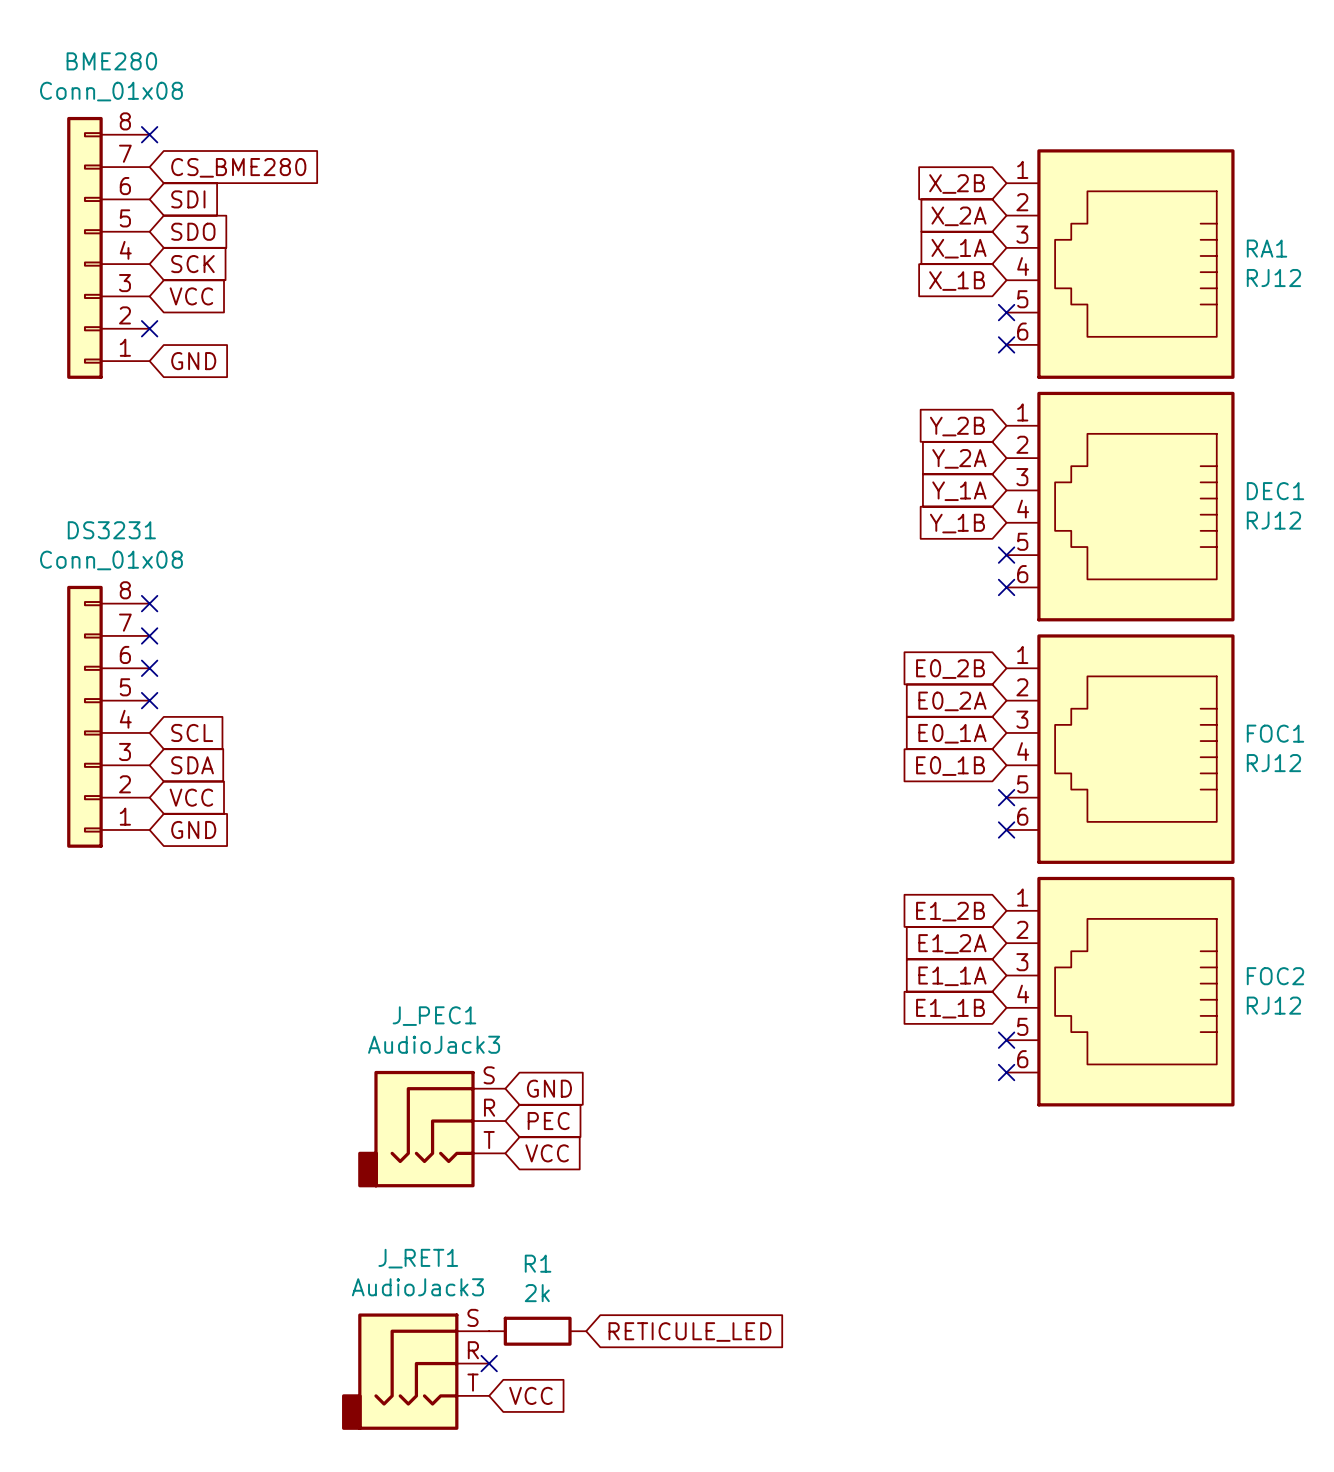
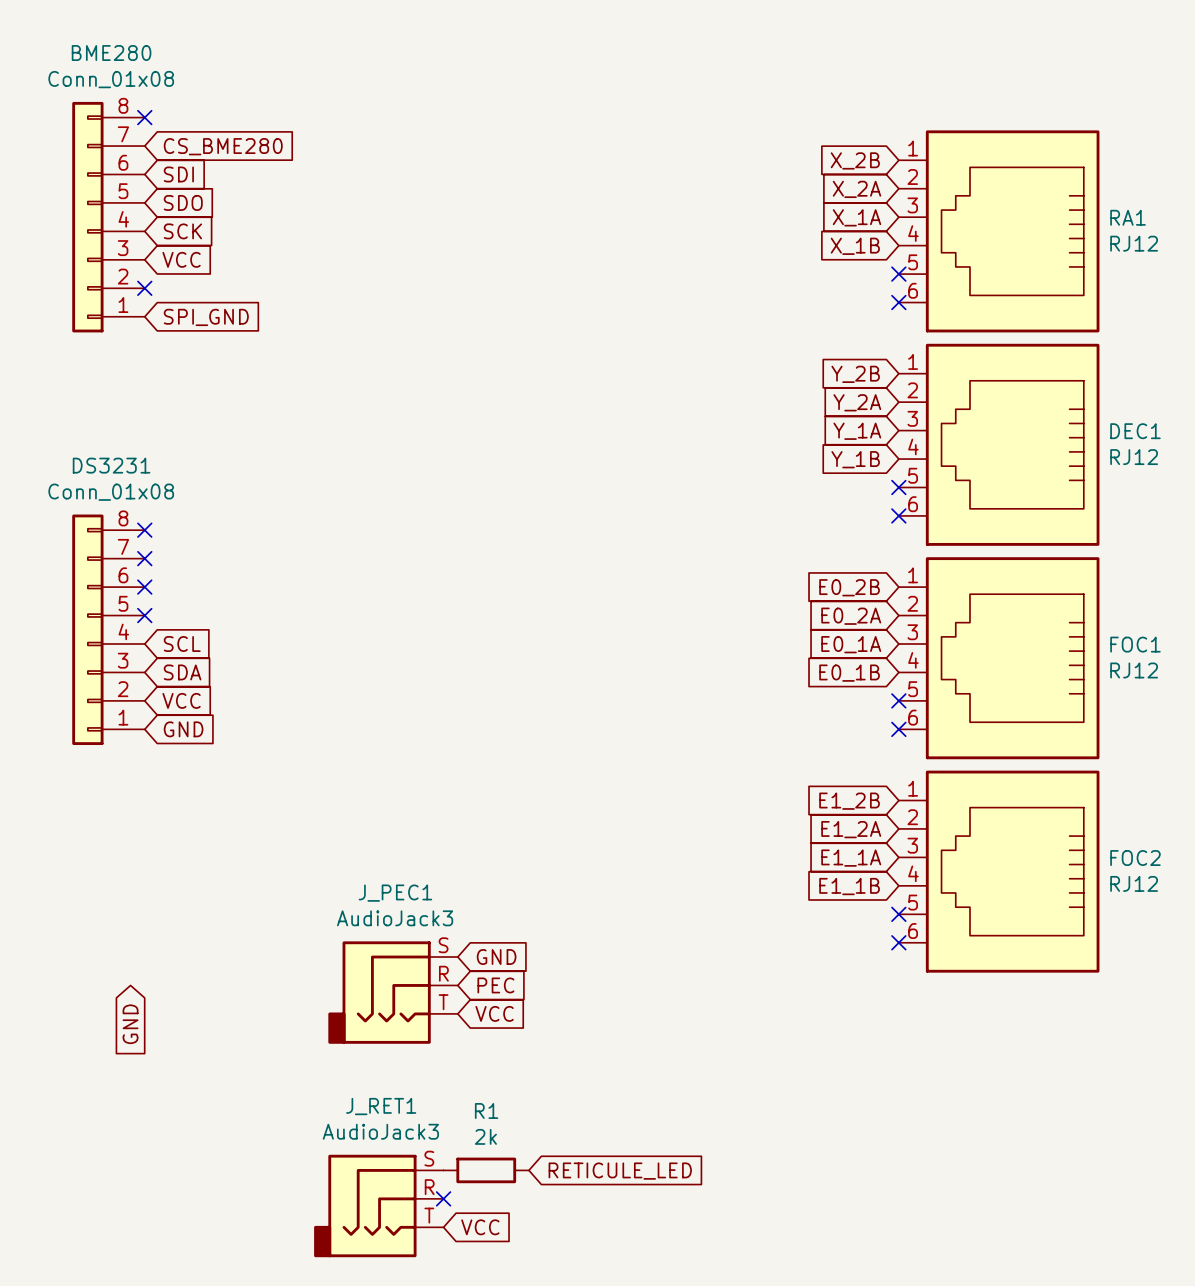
global label: GND (193, 361) -> SPI_GND (206, 317)
global label: none -> GND (130, 1024)

